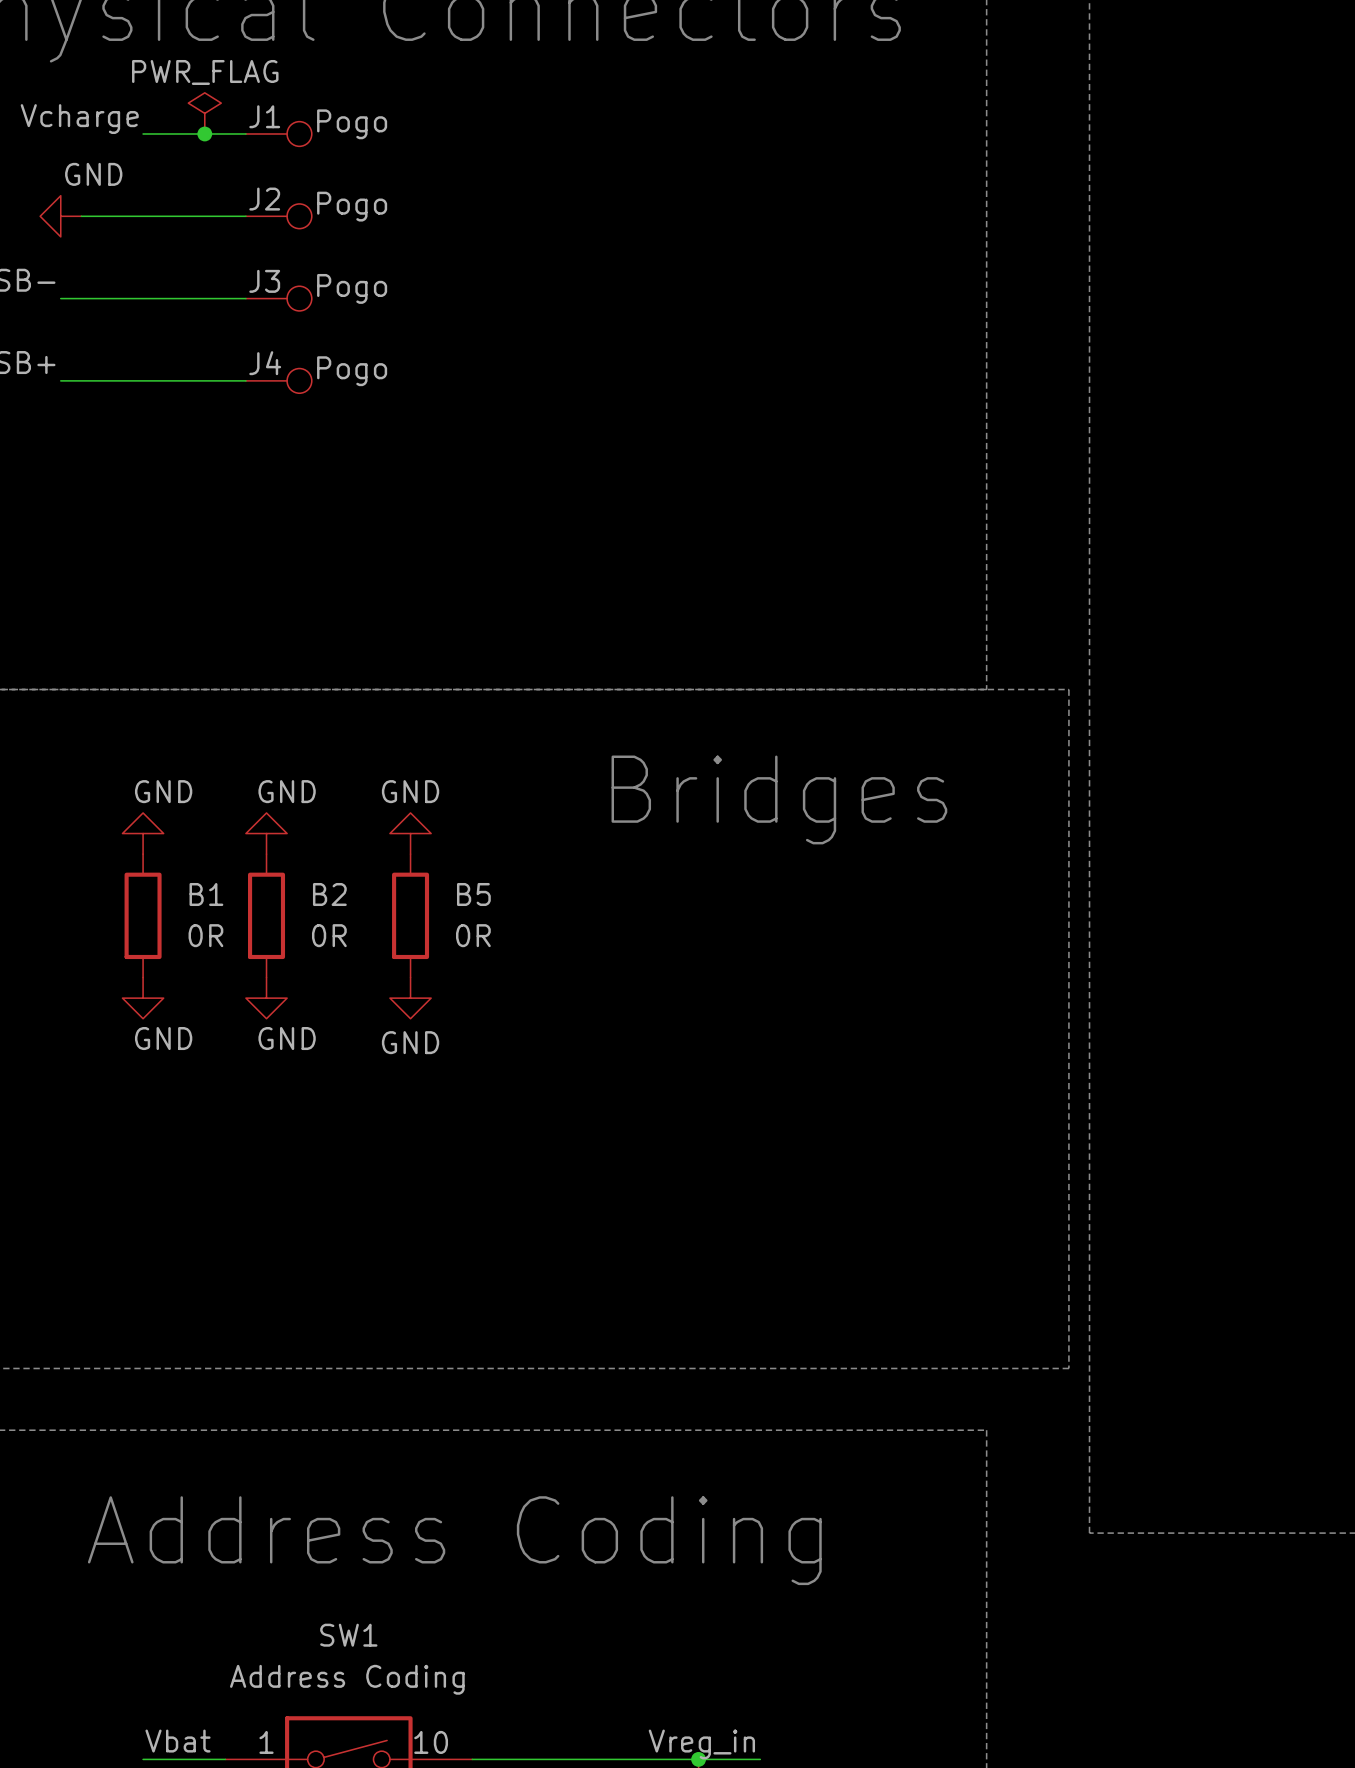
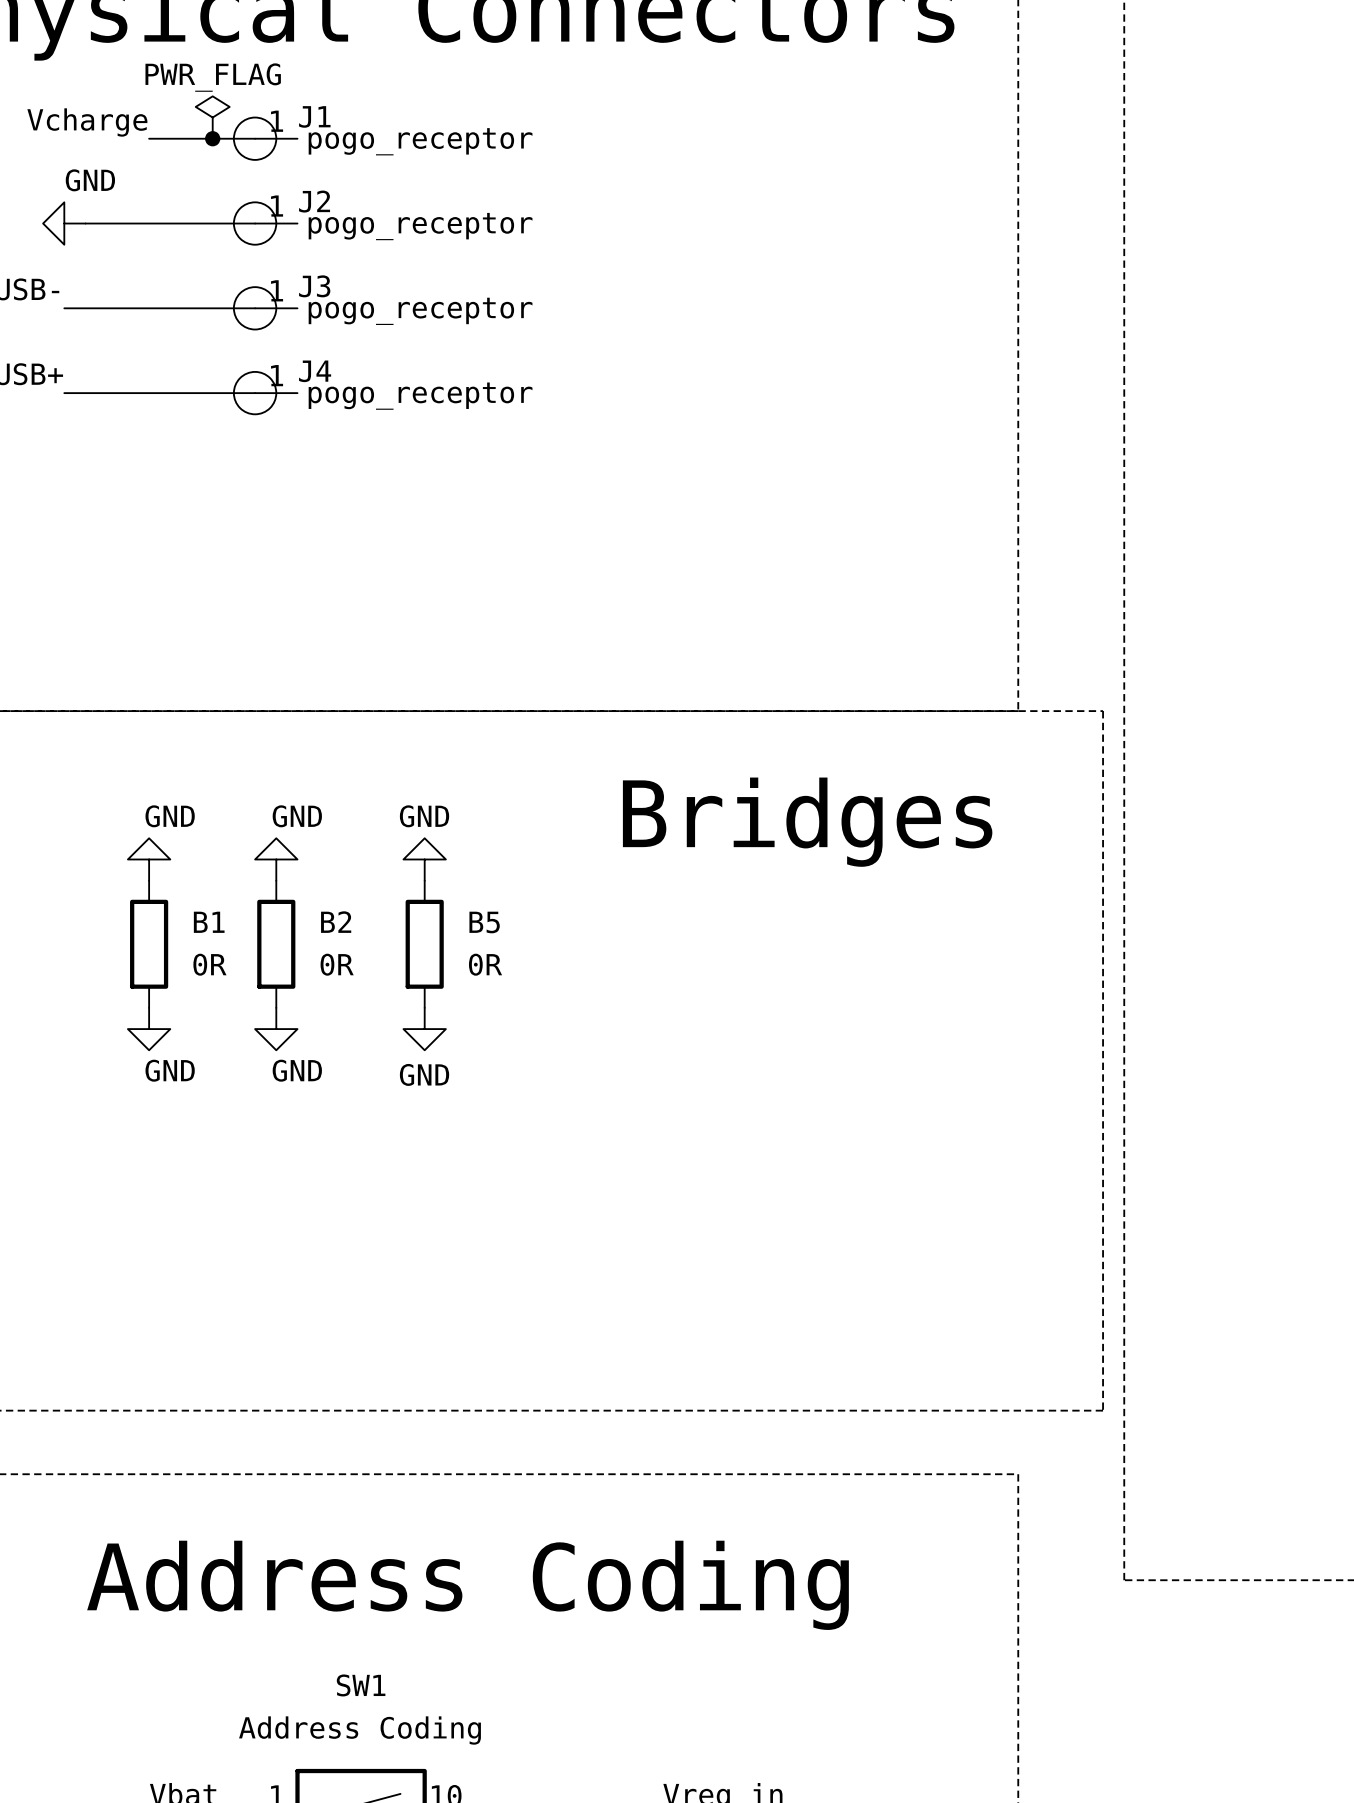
J1 name position: J1 (264, 116) -> J1 (314, 116)
J1 symbol: [245, 121, 312, 147] -> [233, 117, 298, 160]
J1 value: Pogo (352, 124) -> none
J2 name position: J2 (264, 199) -> J2 (314, 201)
J2 symbol: [245, 203, 312, 229] -> [233, 202, 298, 245]
J2 value: Pogo (352, 206) -> none
J3 name position: J3 (264, 281) -> J3 (314, 286)
J3 symbol: [245, 286, 312, 311] -> [233, 287, 298, 330]
J3 value: Pogo (352, 288) -> none
J4 name position: J4 (265, 363) -> J4 (315, 371)
J4 symbol: [245, 368, 312, 394] -> [233, 371, 298, 415]
J4 value: Pogo (352, 371) -> none

